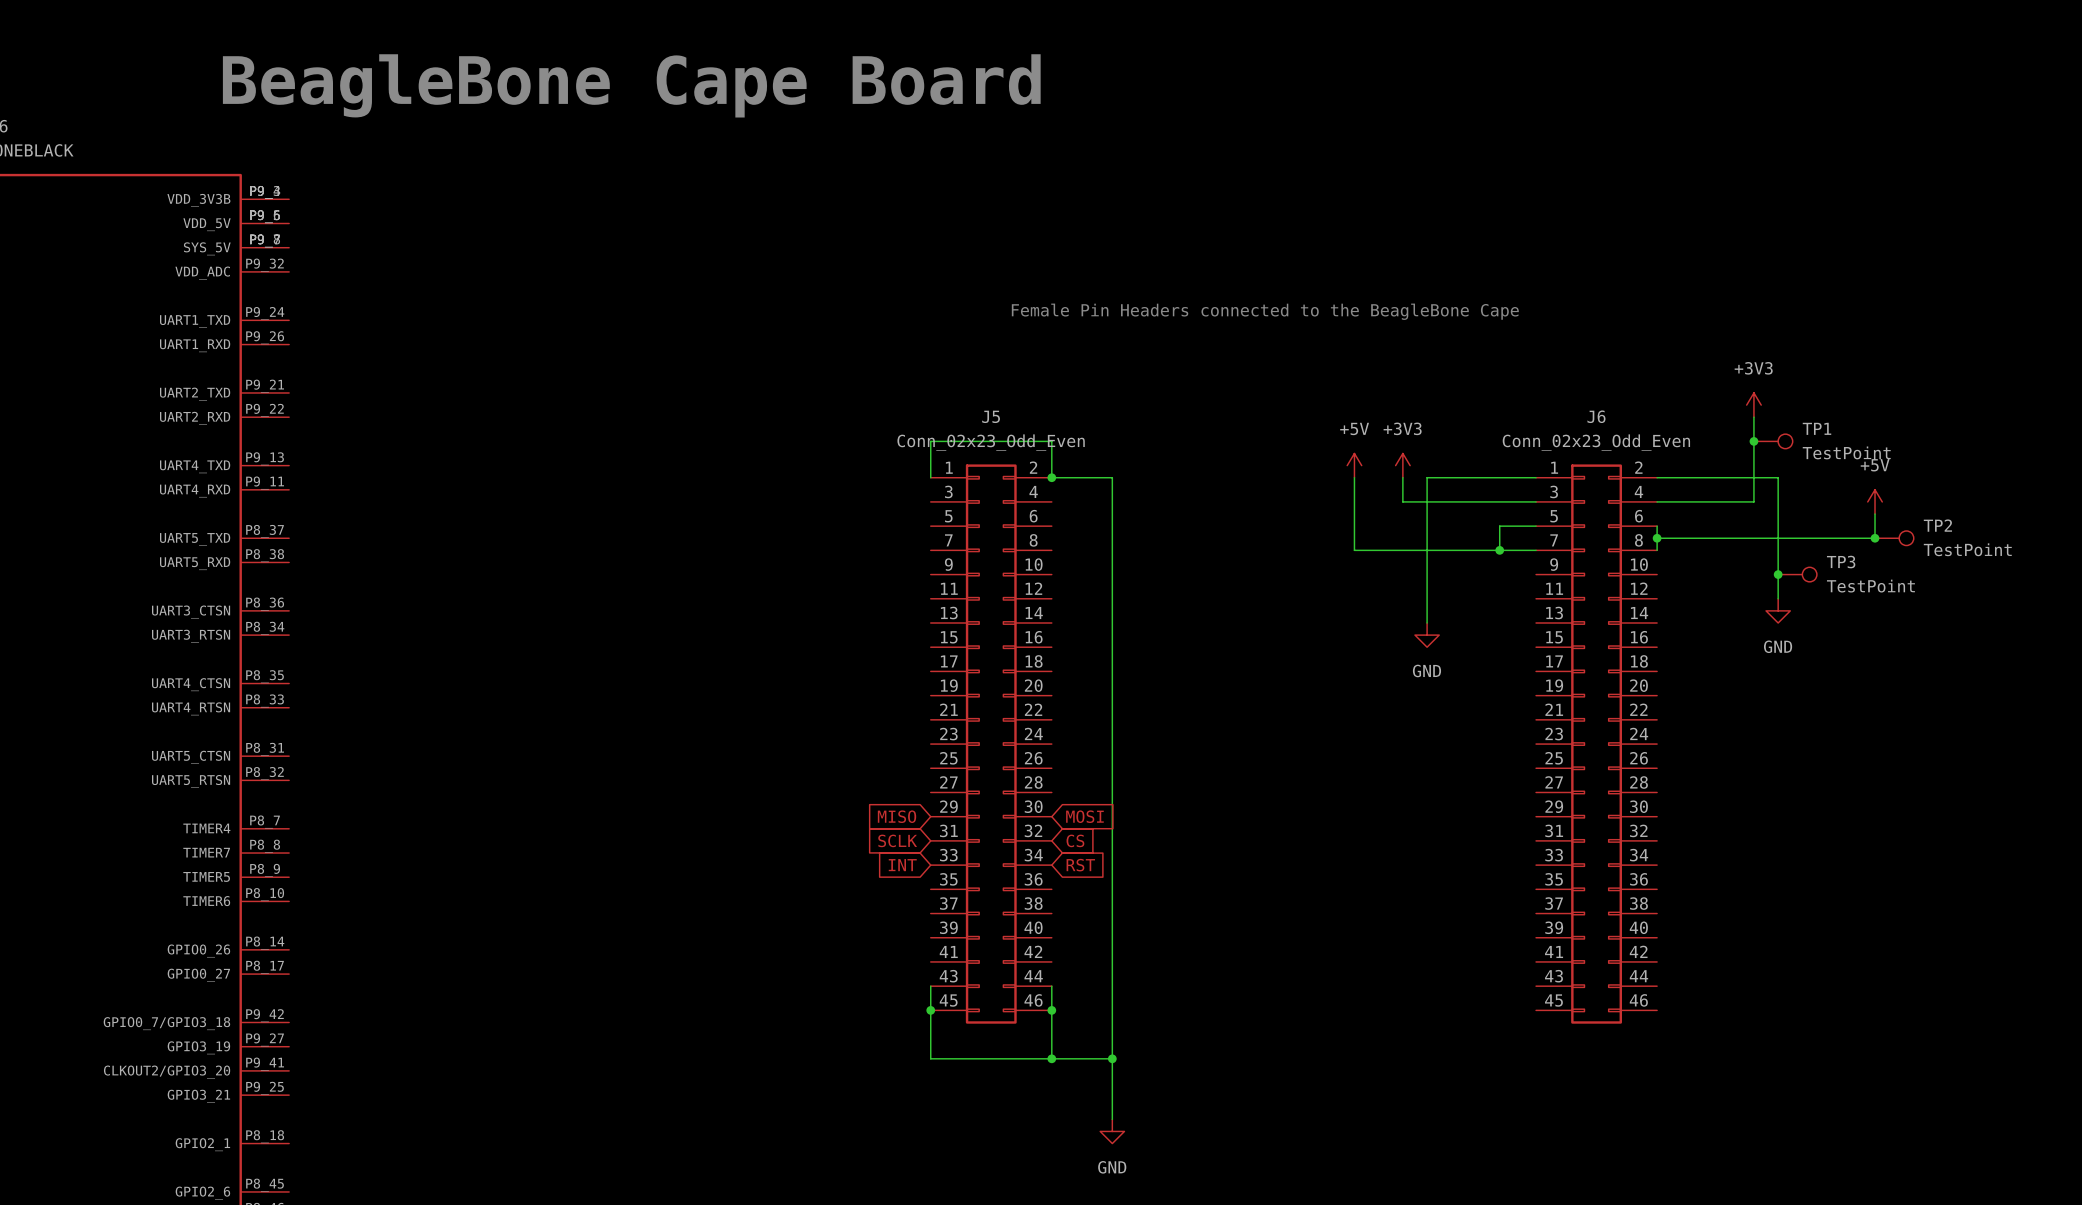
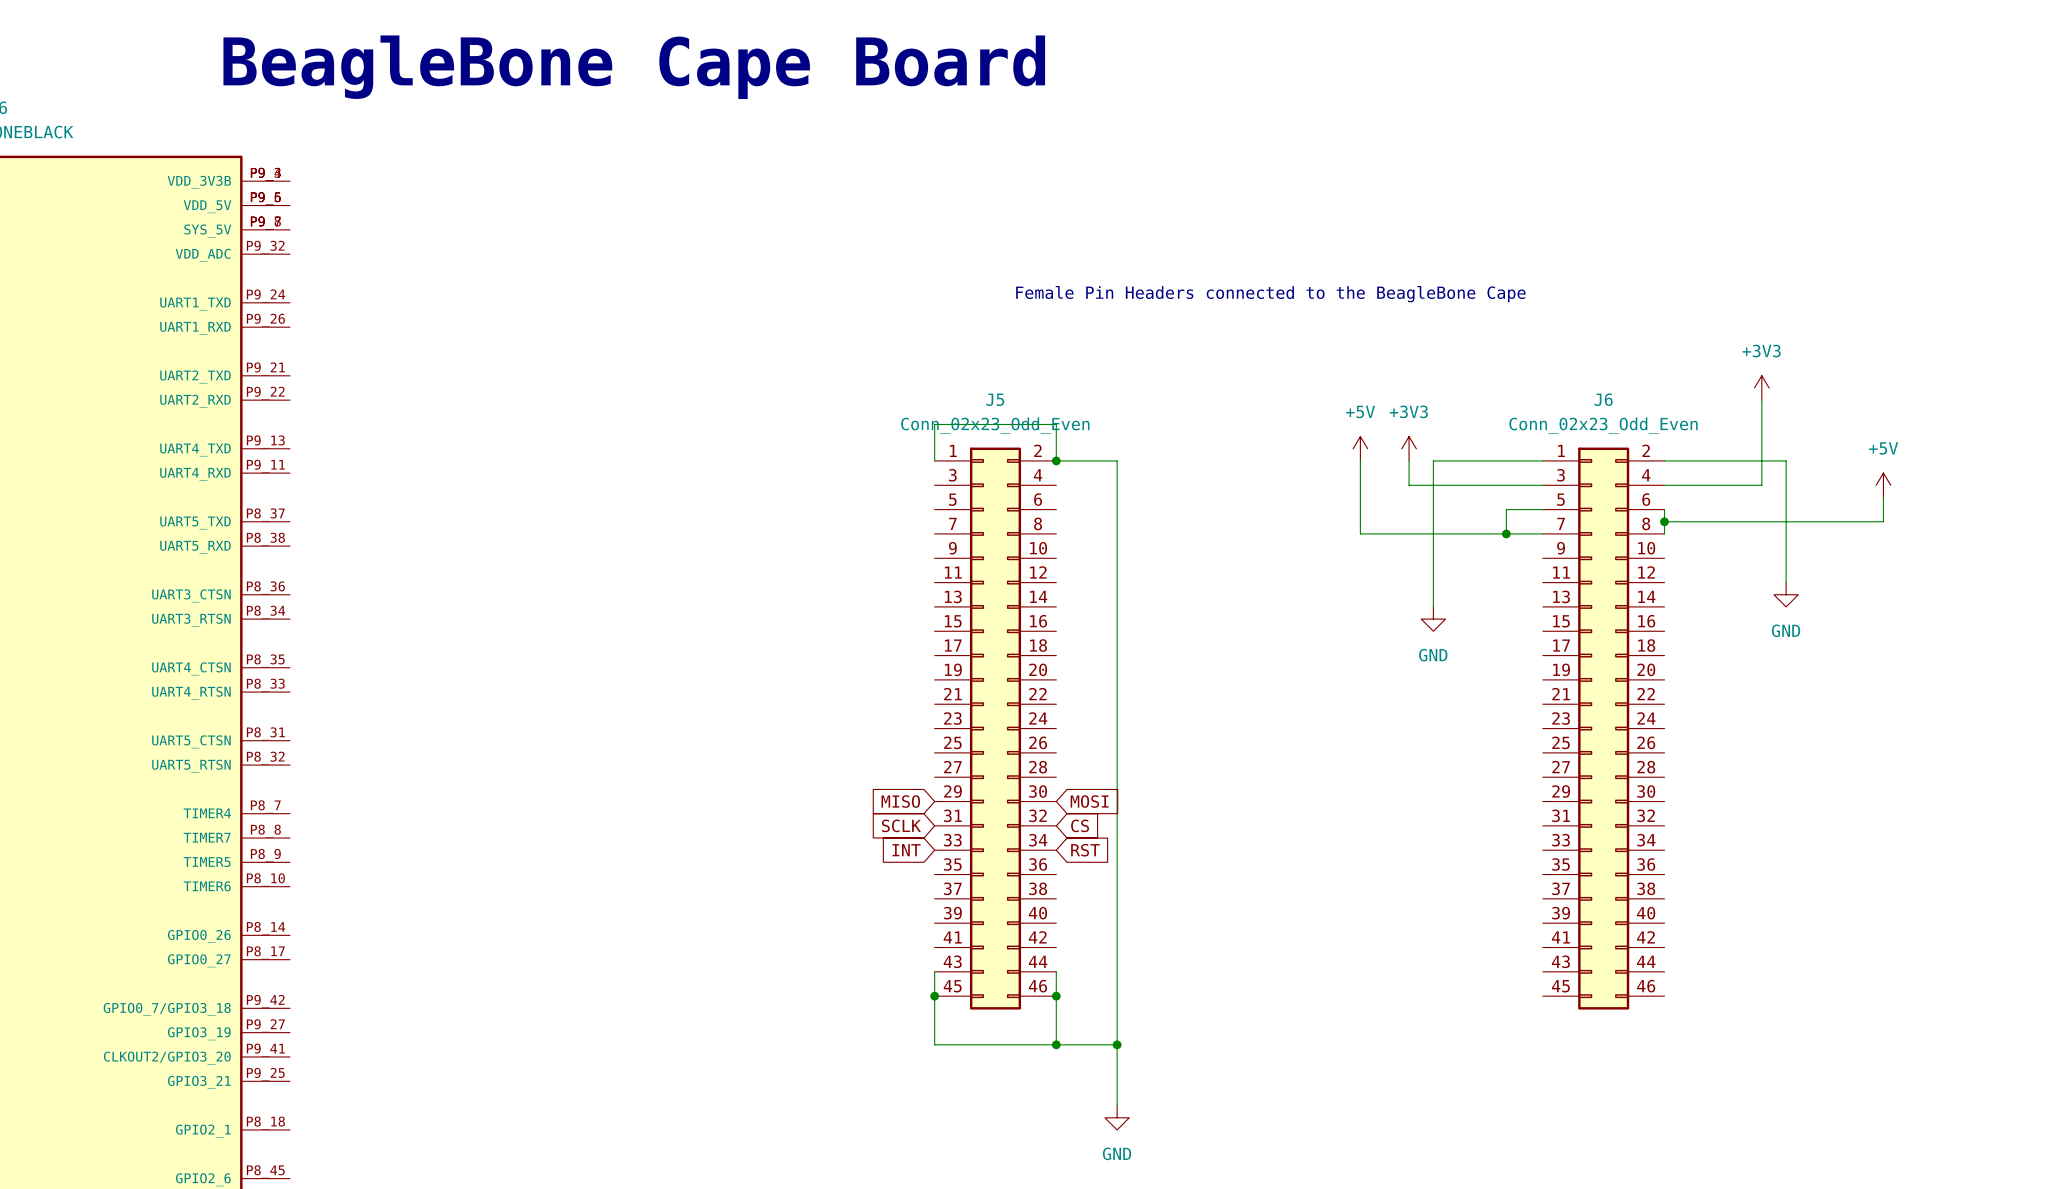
junction: (1753, 441) -> none
TP1: TestPoint (1773, 441) -> none
junction: (1875, 538) -> none
TP2: TestPoint (1894, 538) -> none
junction: (1778, 574) -> none
TP3: TestPoint (1797, 574) -> none

